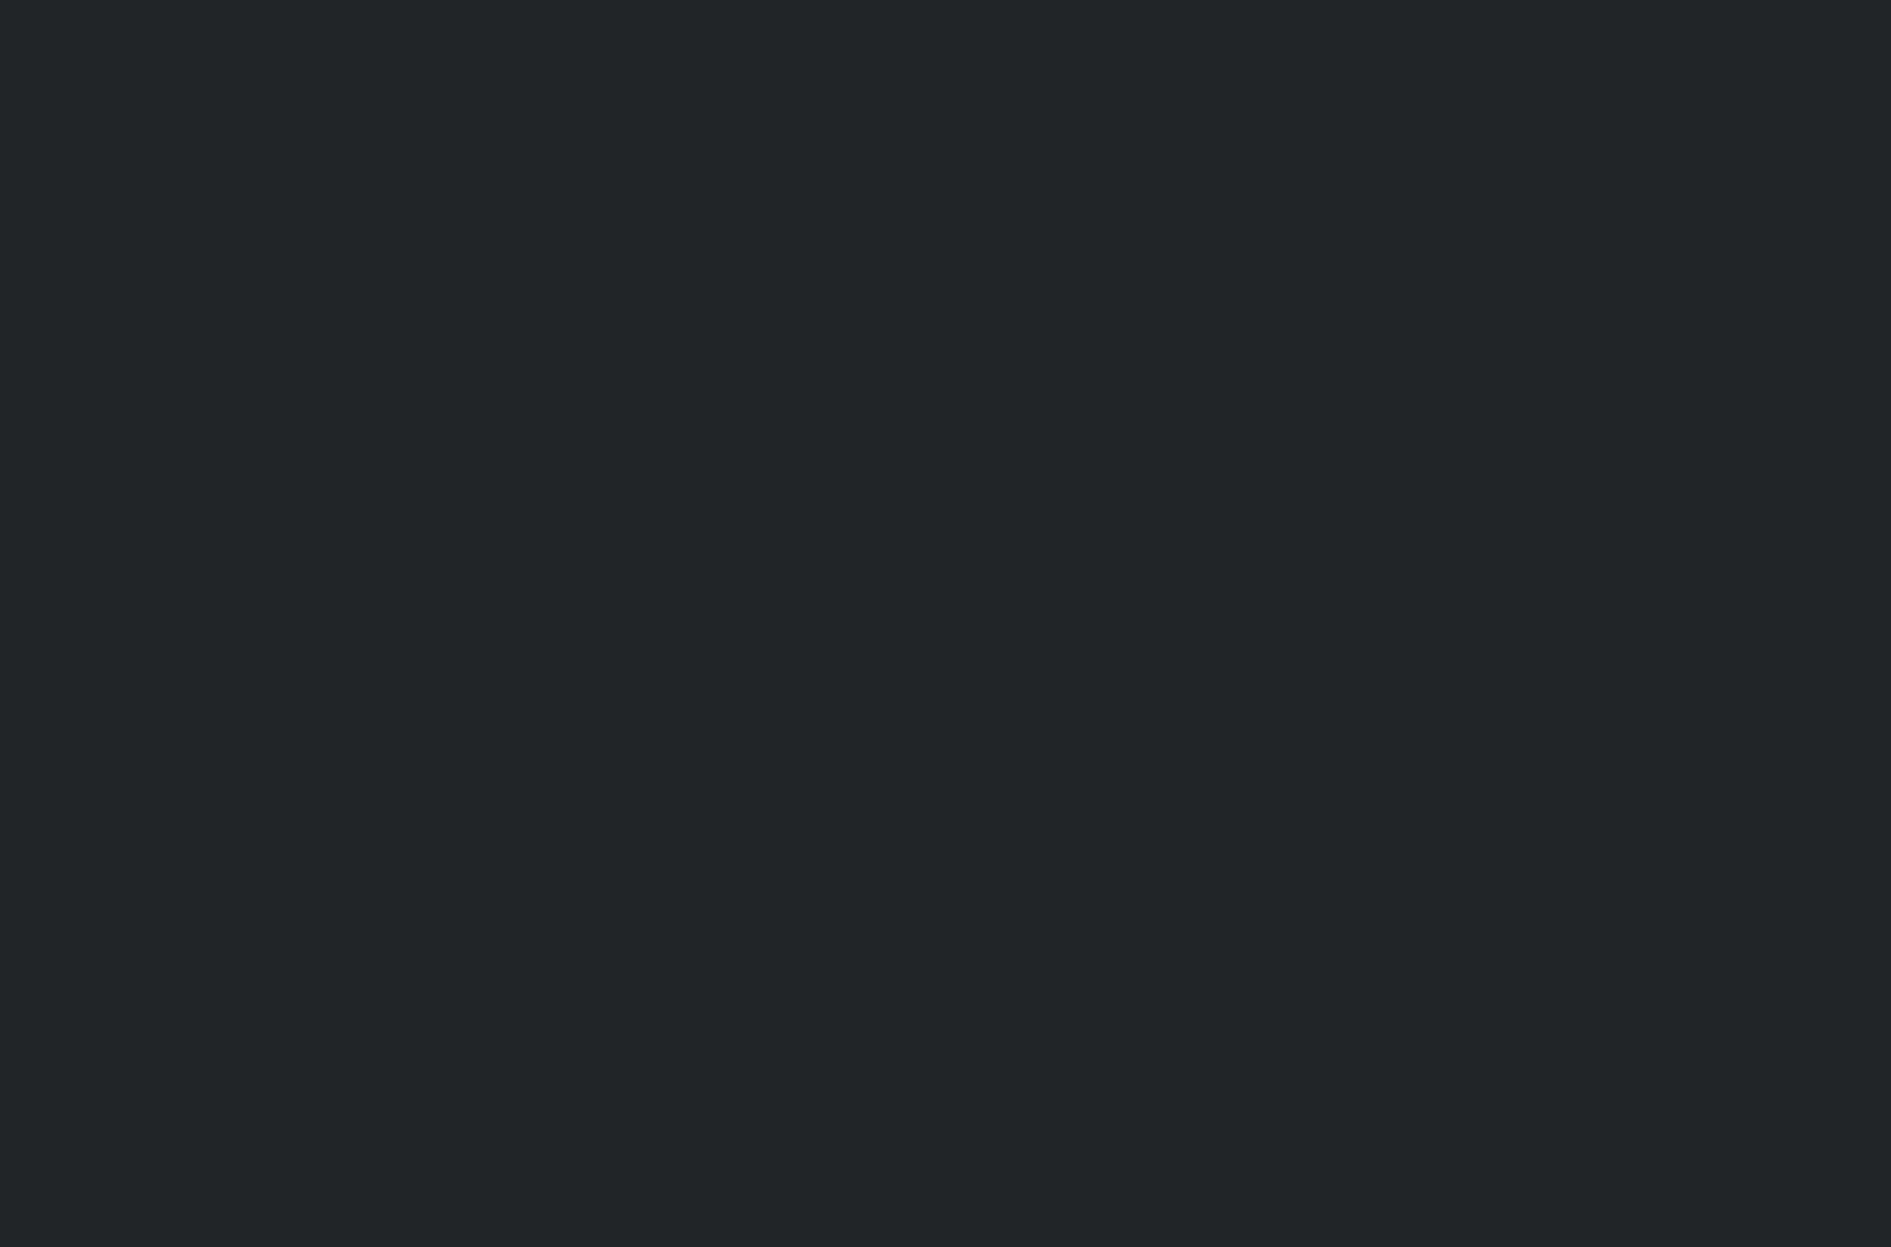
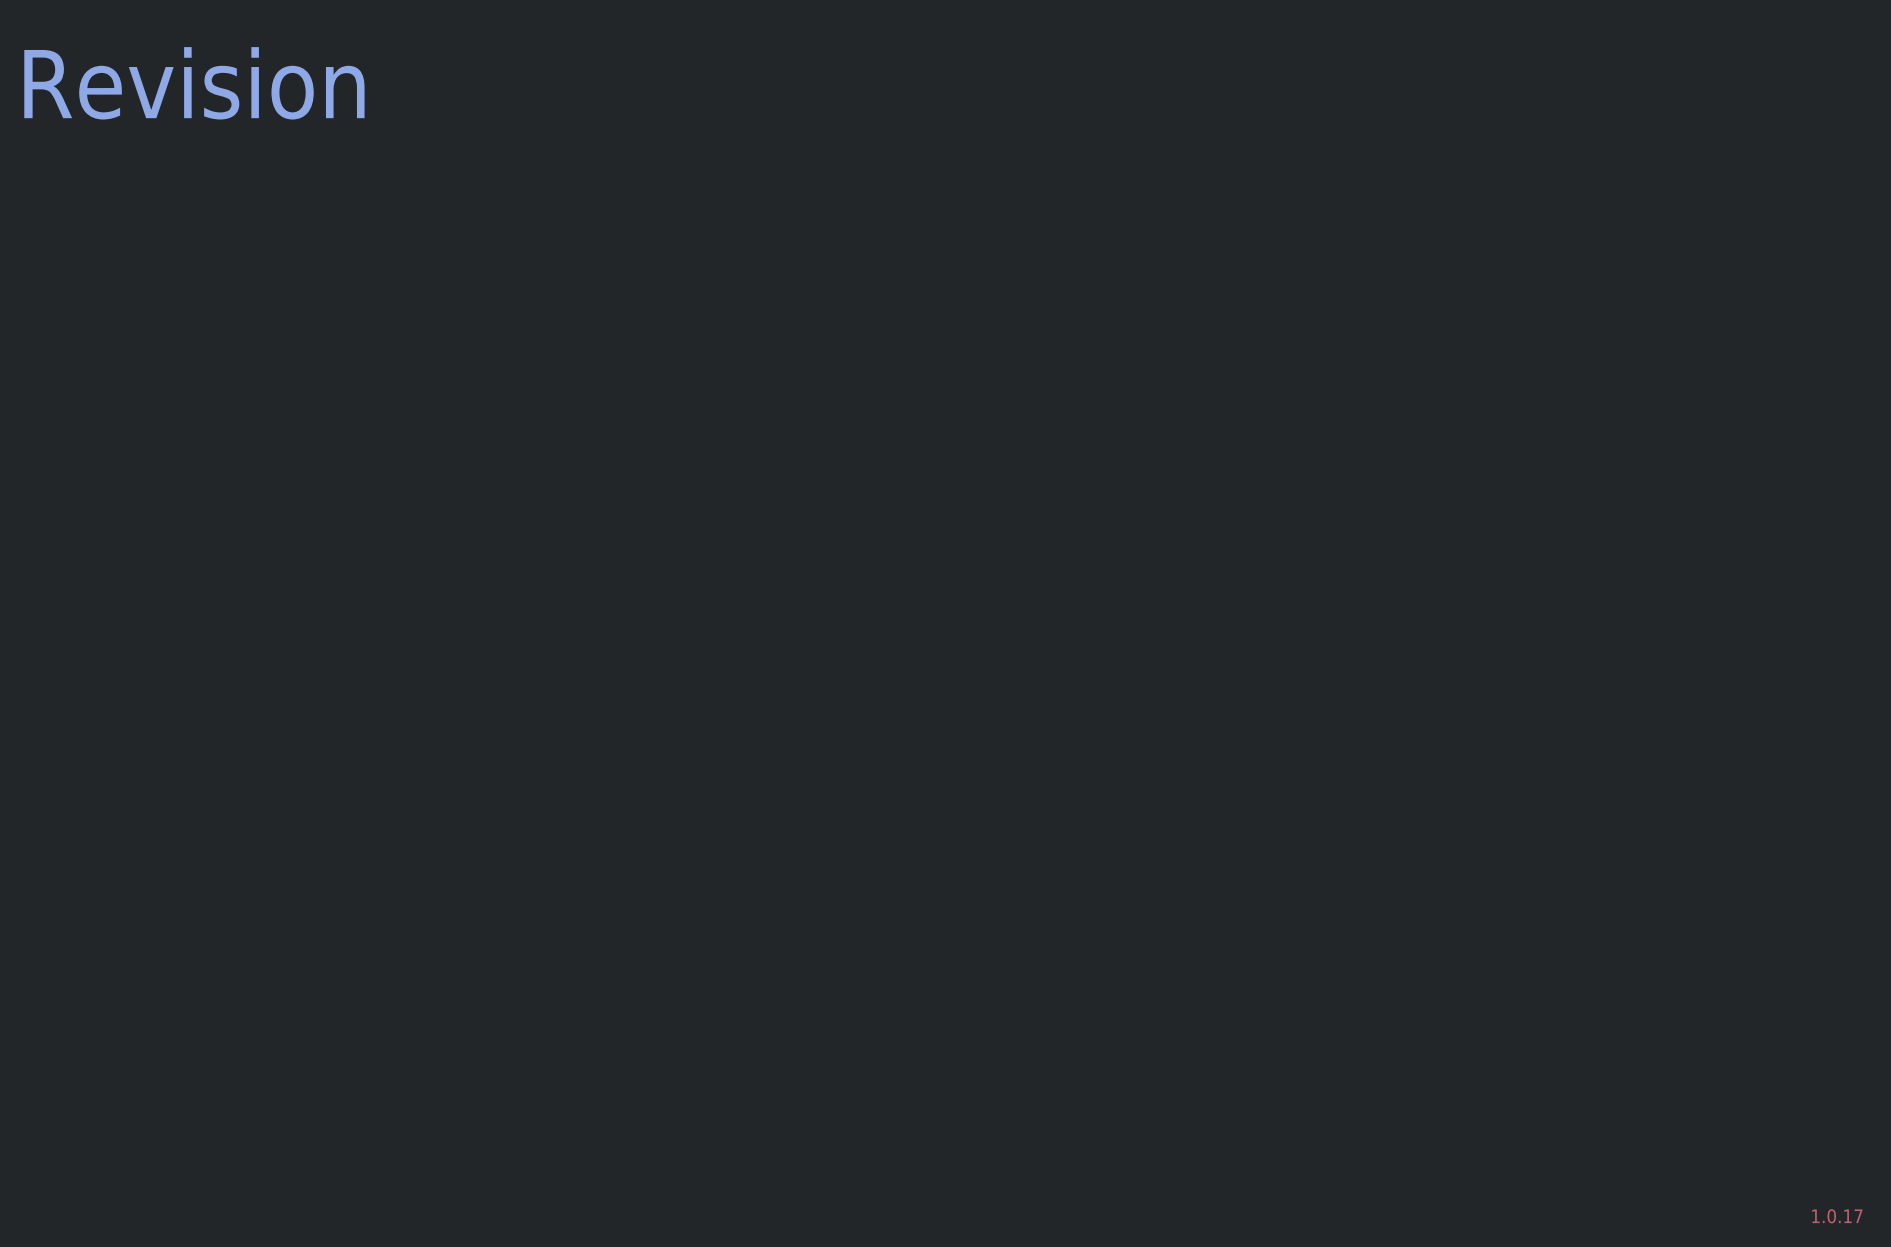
text: none -> Revision (194, 83)
text: none -> 1.0.17 (1837, 1216)

